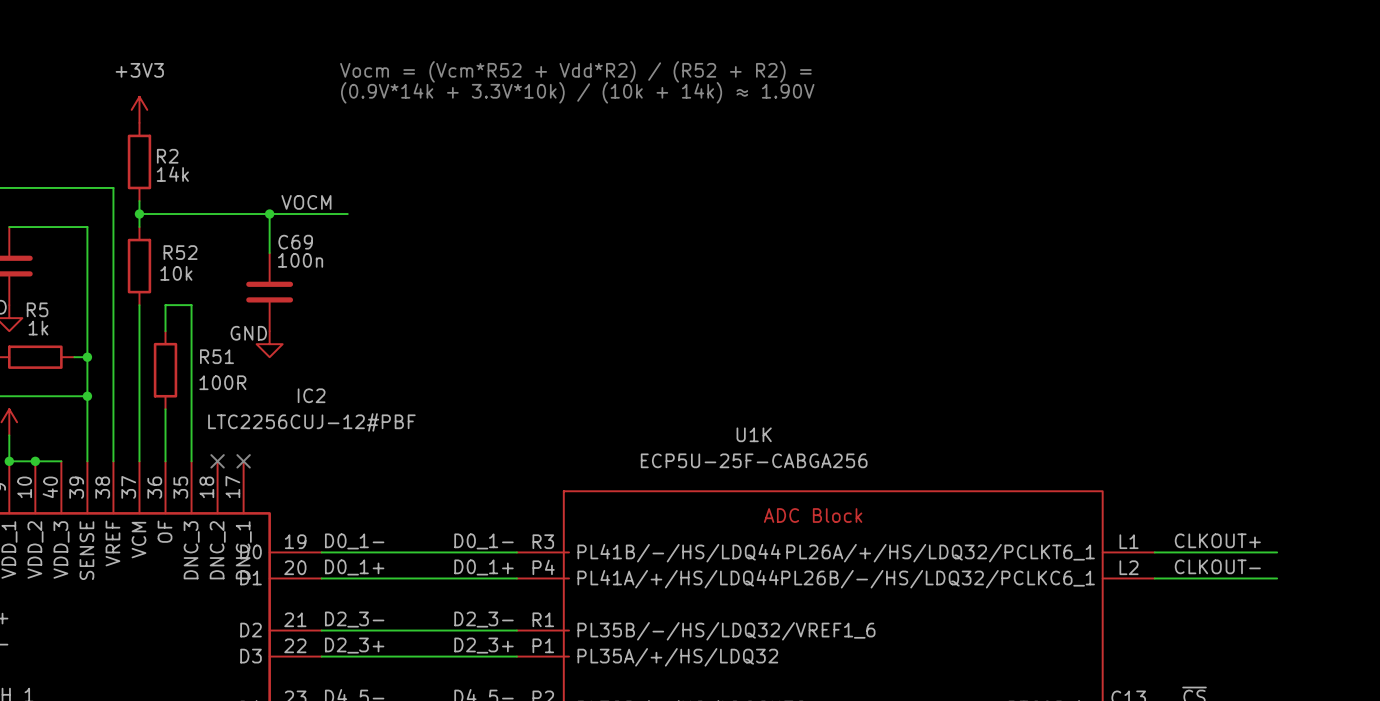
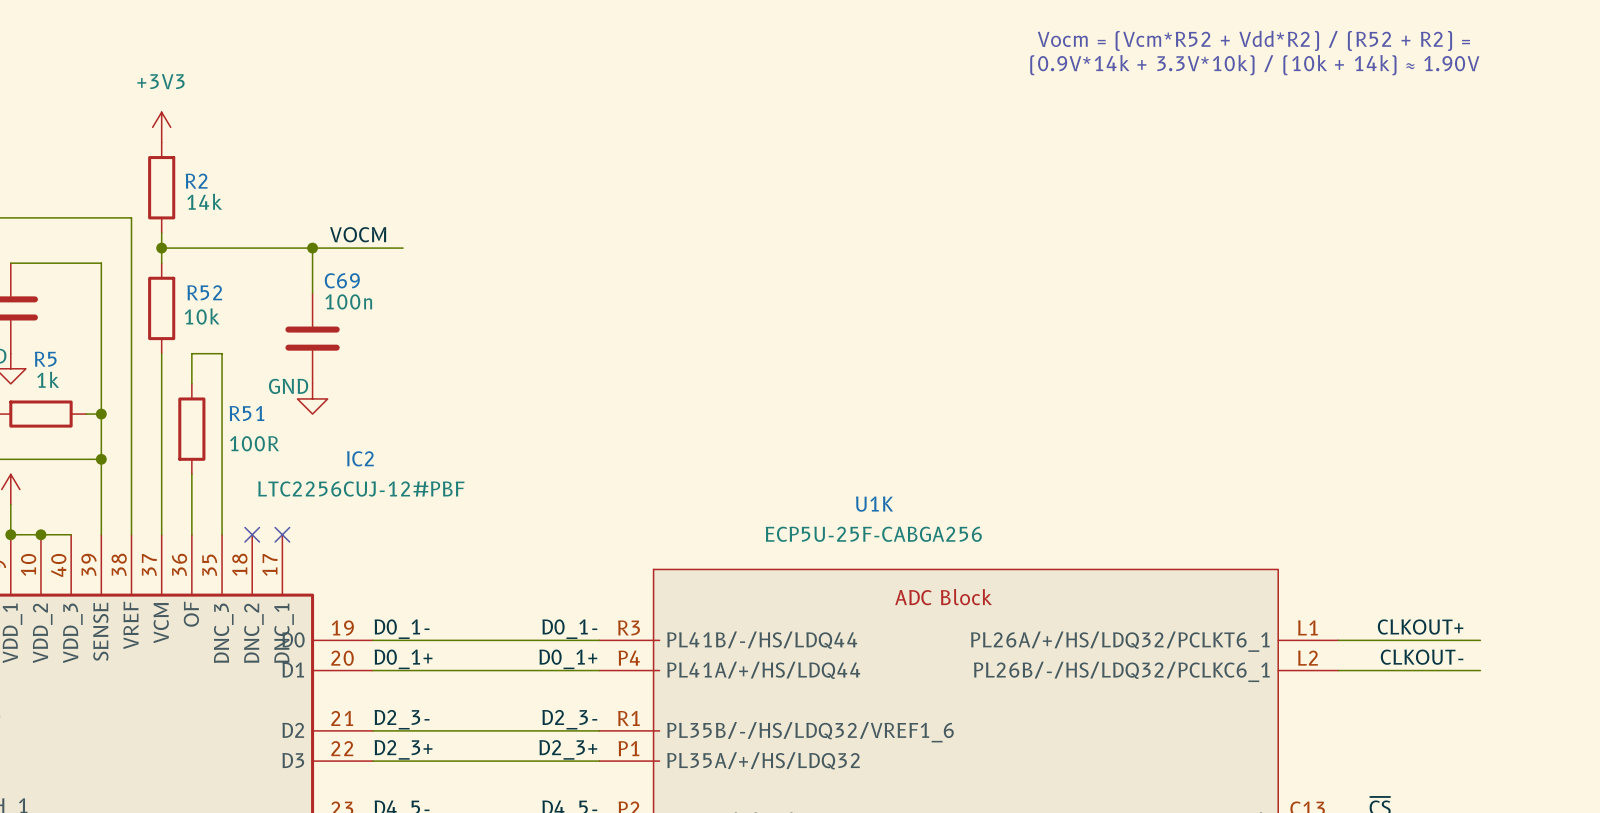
text: none -> Vocm = (Vcm*R52 + Vdd*R2) / (R52 + R2) = (1253, 40)
text: none -> (0.9V*14k + 3.3V*10k) / (10k + 14k) ≈ 1.90V (1254, 65)
text: Vocm = (Vcm*R52 + Vdd*R2) / (R52 + R2) = (575, 71) -> none
text: (0.9V*14k + 3.3V*10k) / (10k + 14k) ≈ 1.90V (577, 92) -> none

